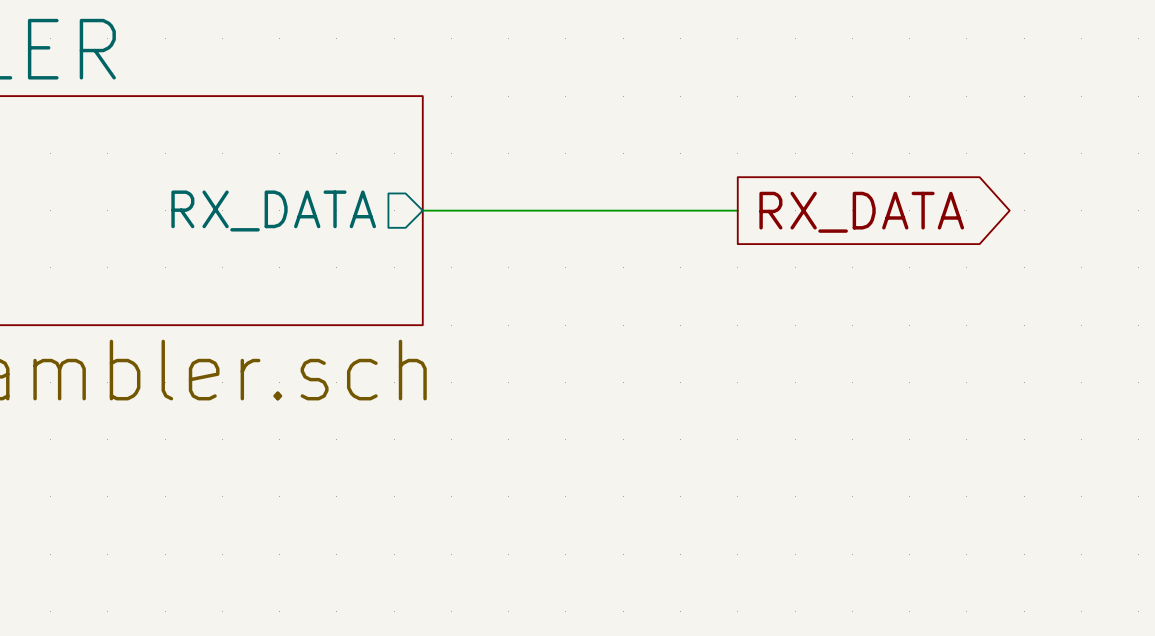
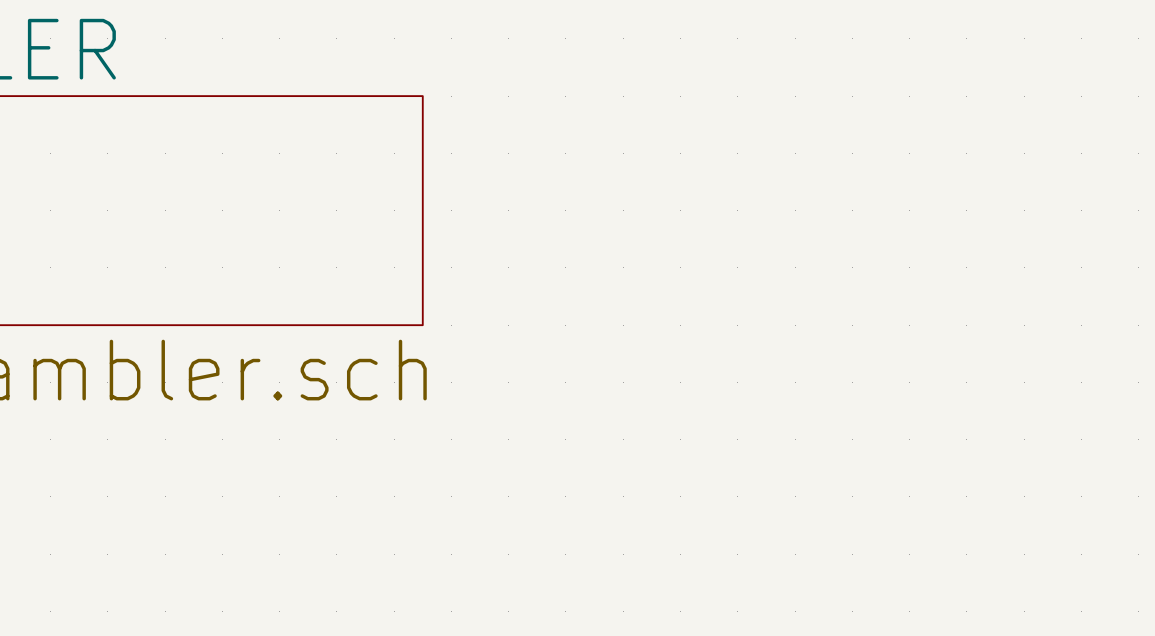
sheet pin: RX_DATA (273, 210) -> none
wire: (422, 210) (737, 210) -> none
global label: RX_DATA (861, 212) -> none

